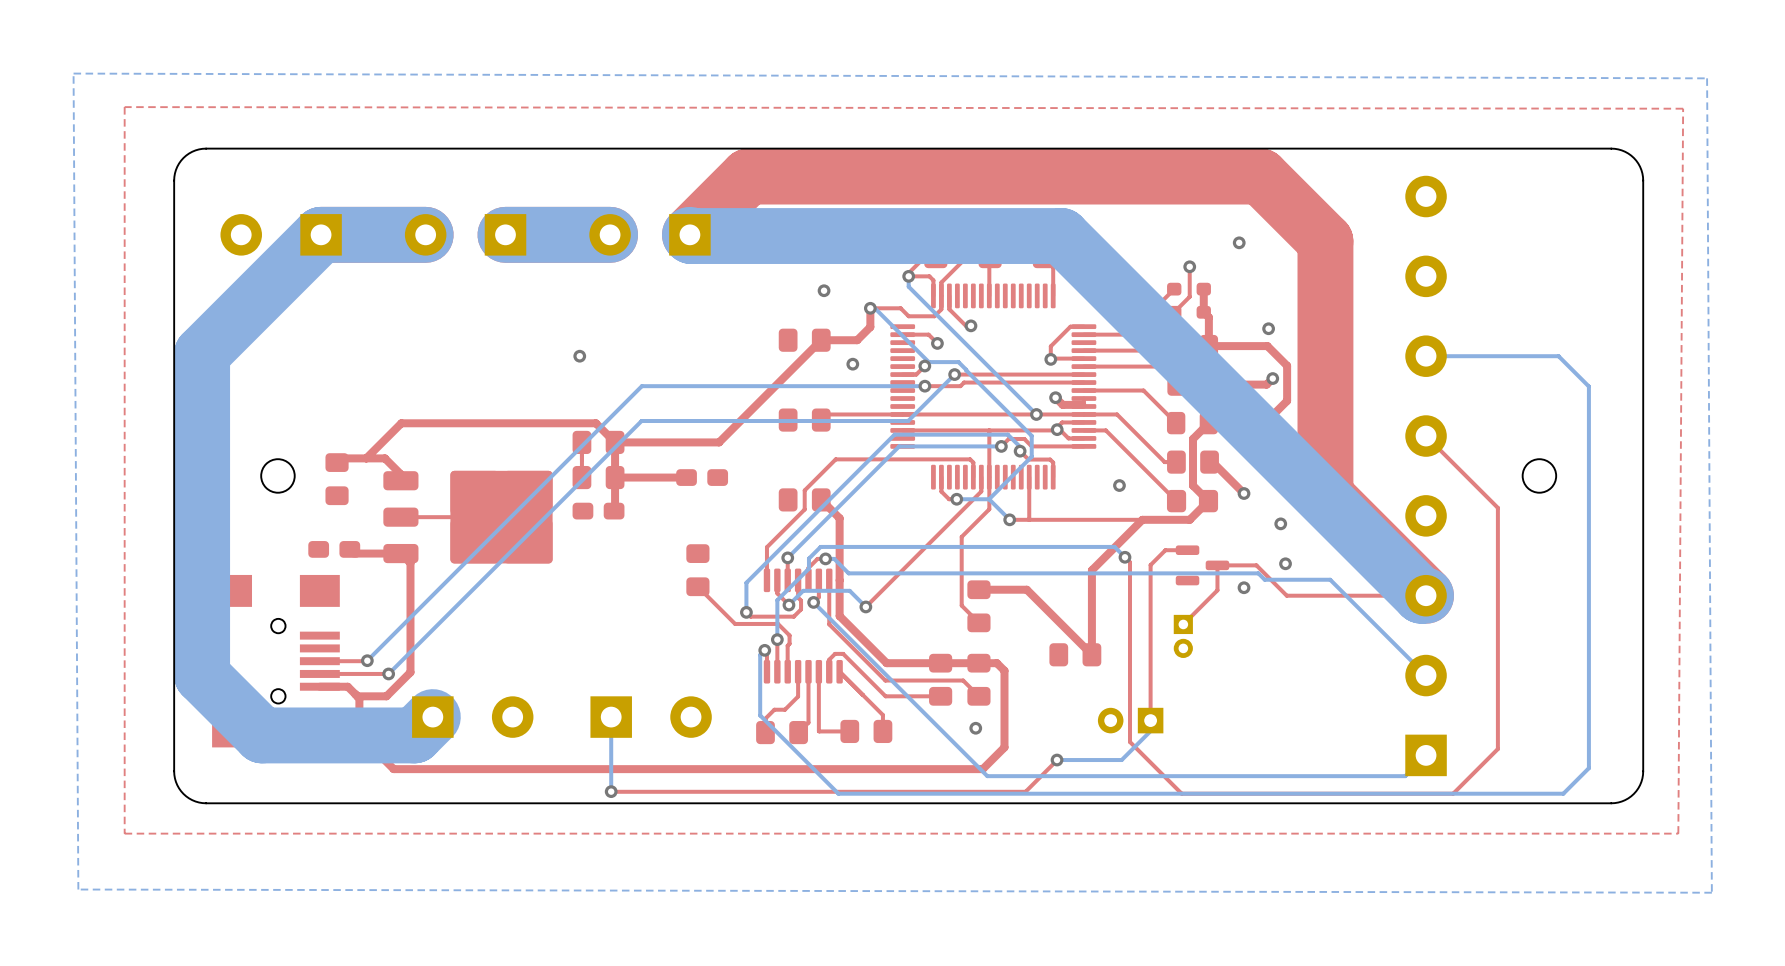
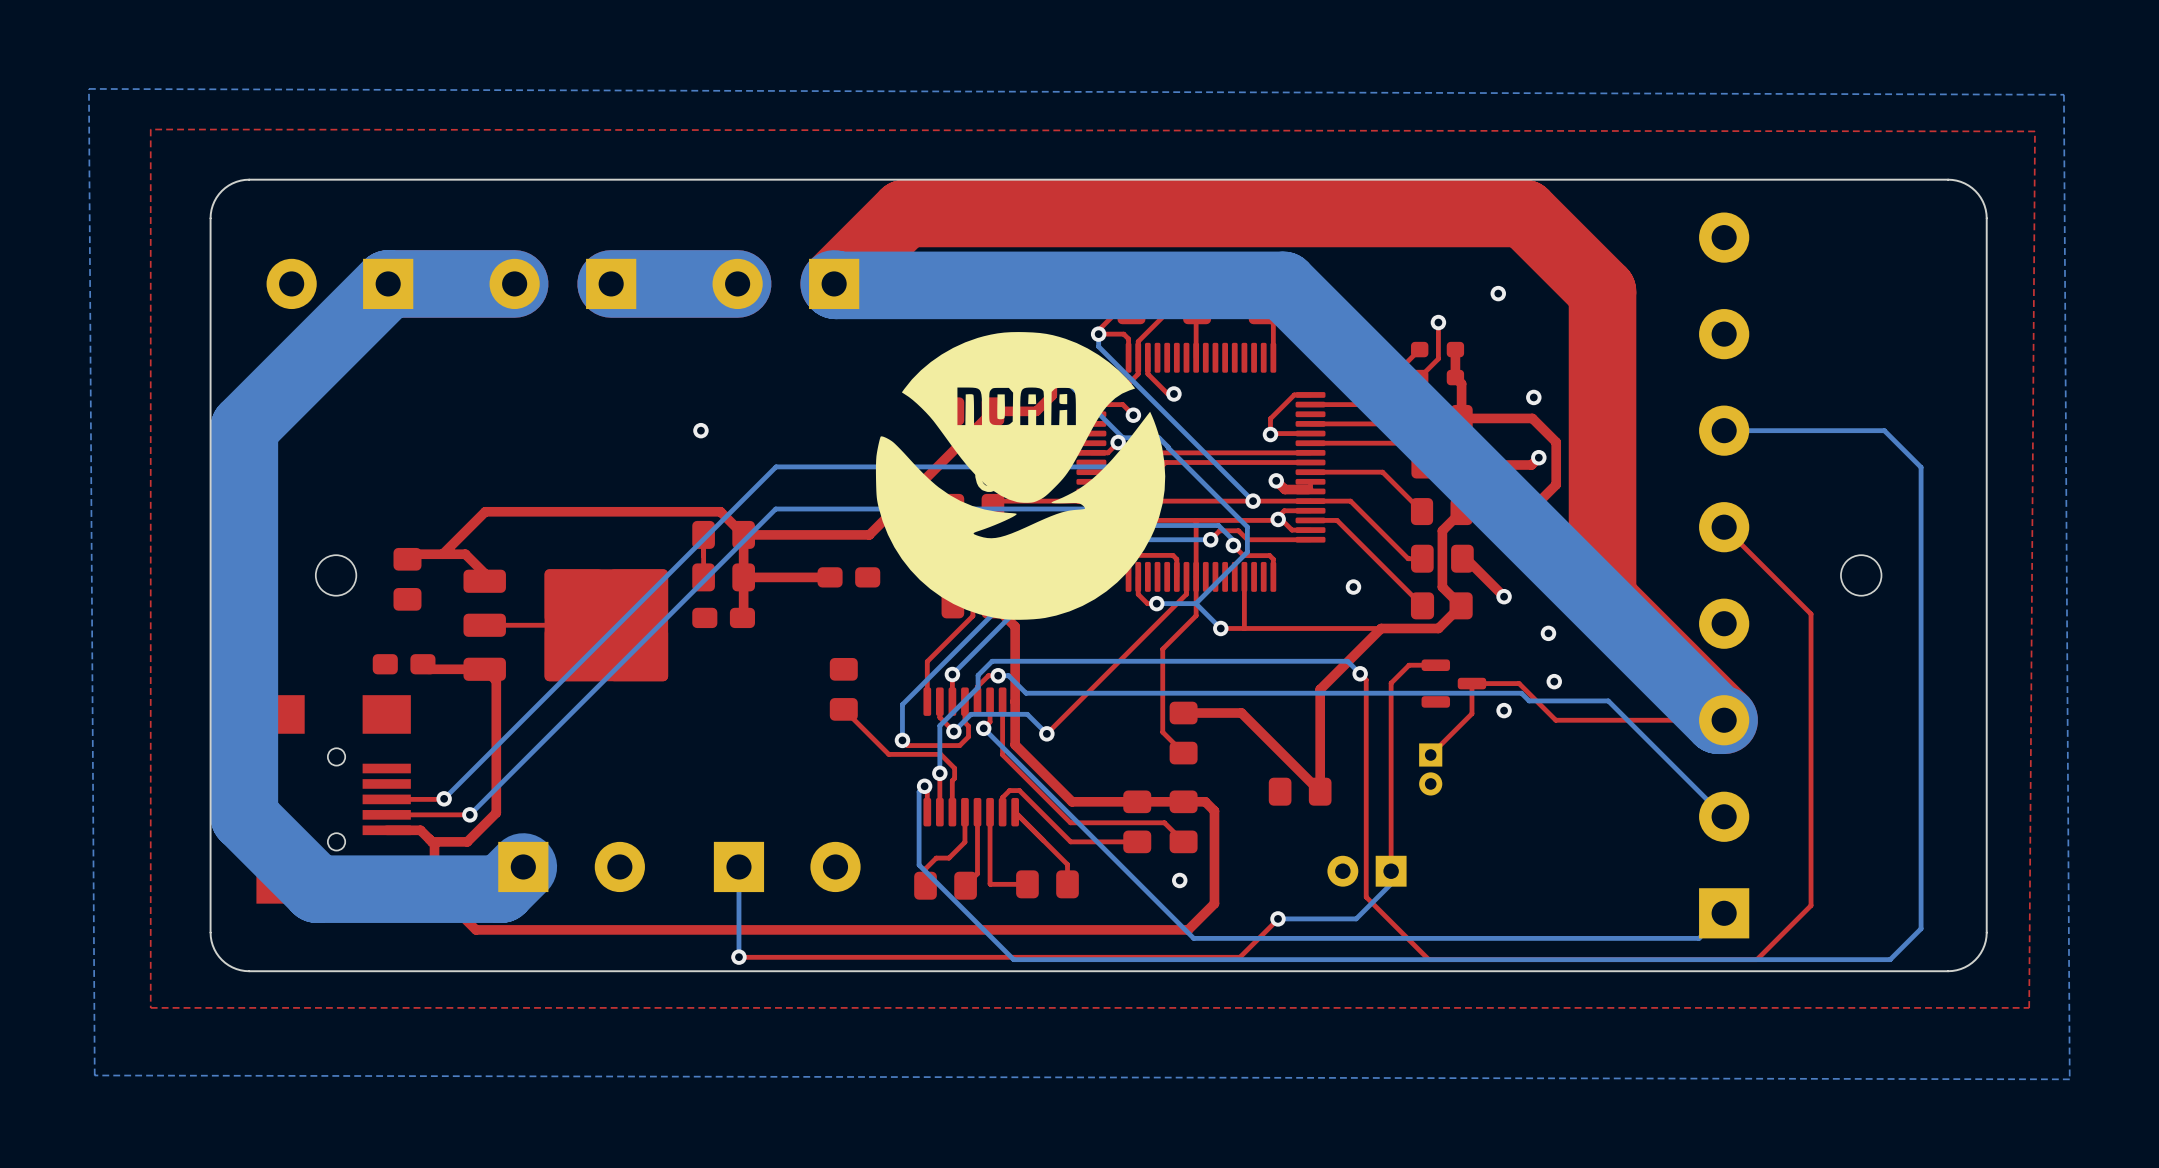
part: none -> (1020, 475)

